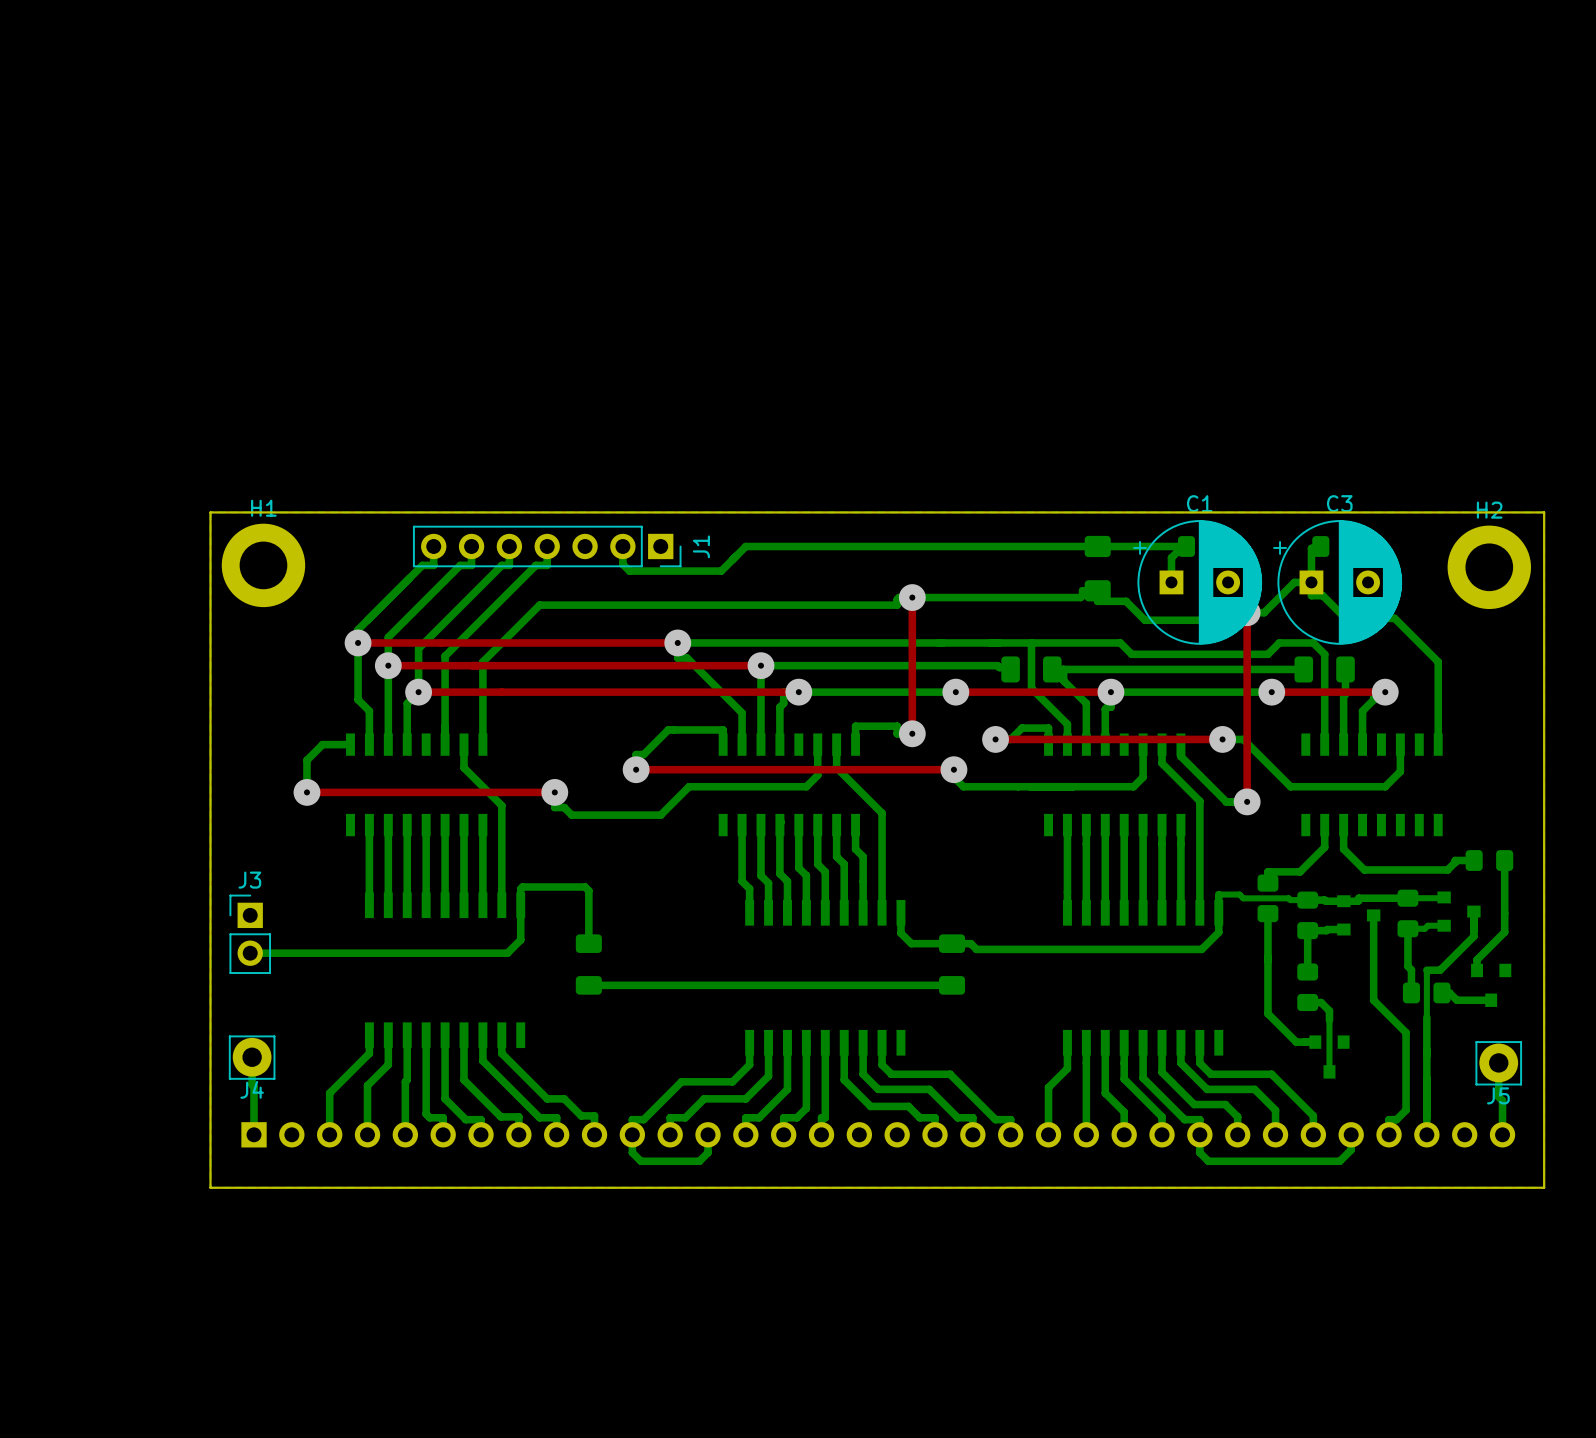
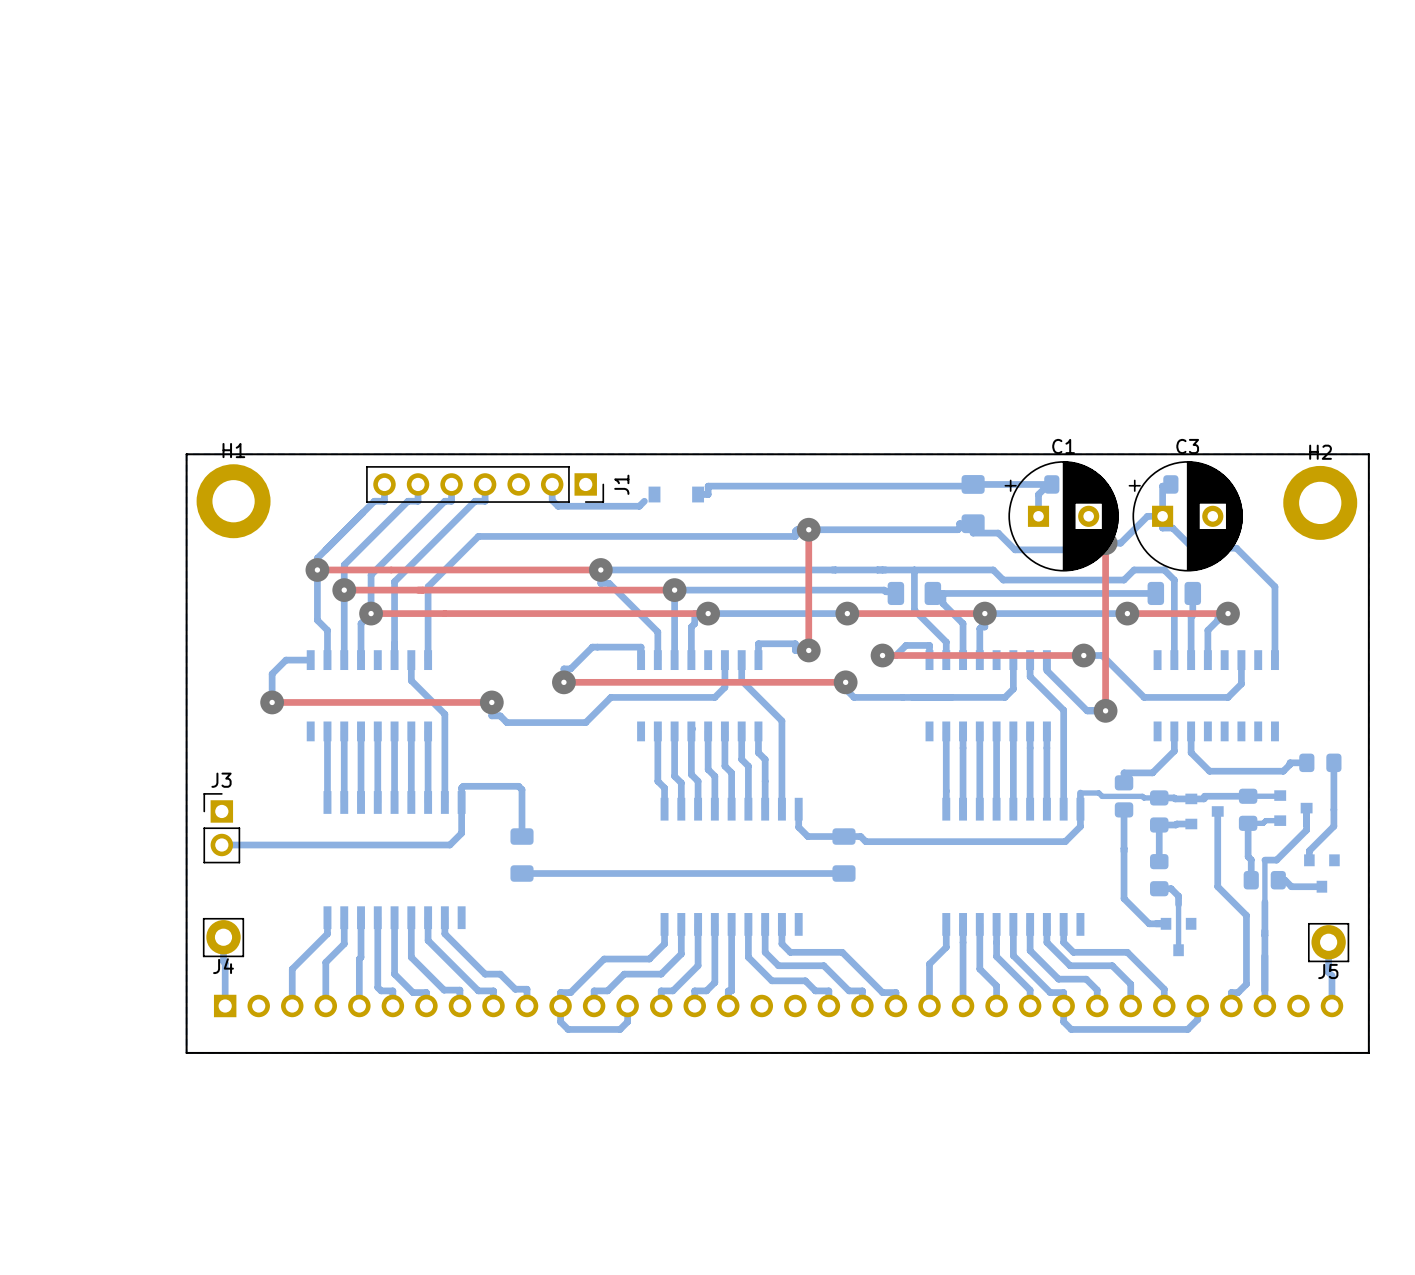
bottom track: (1097, 546) (745, 546) (726, 565) -> (973, 484) (971, 486) (708, 486) (708, 494) (698, 494)
part: none -> (676, 494)

